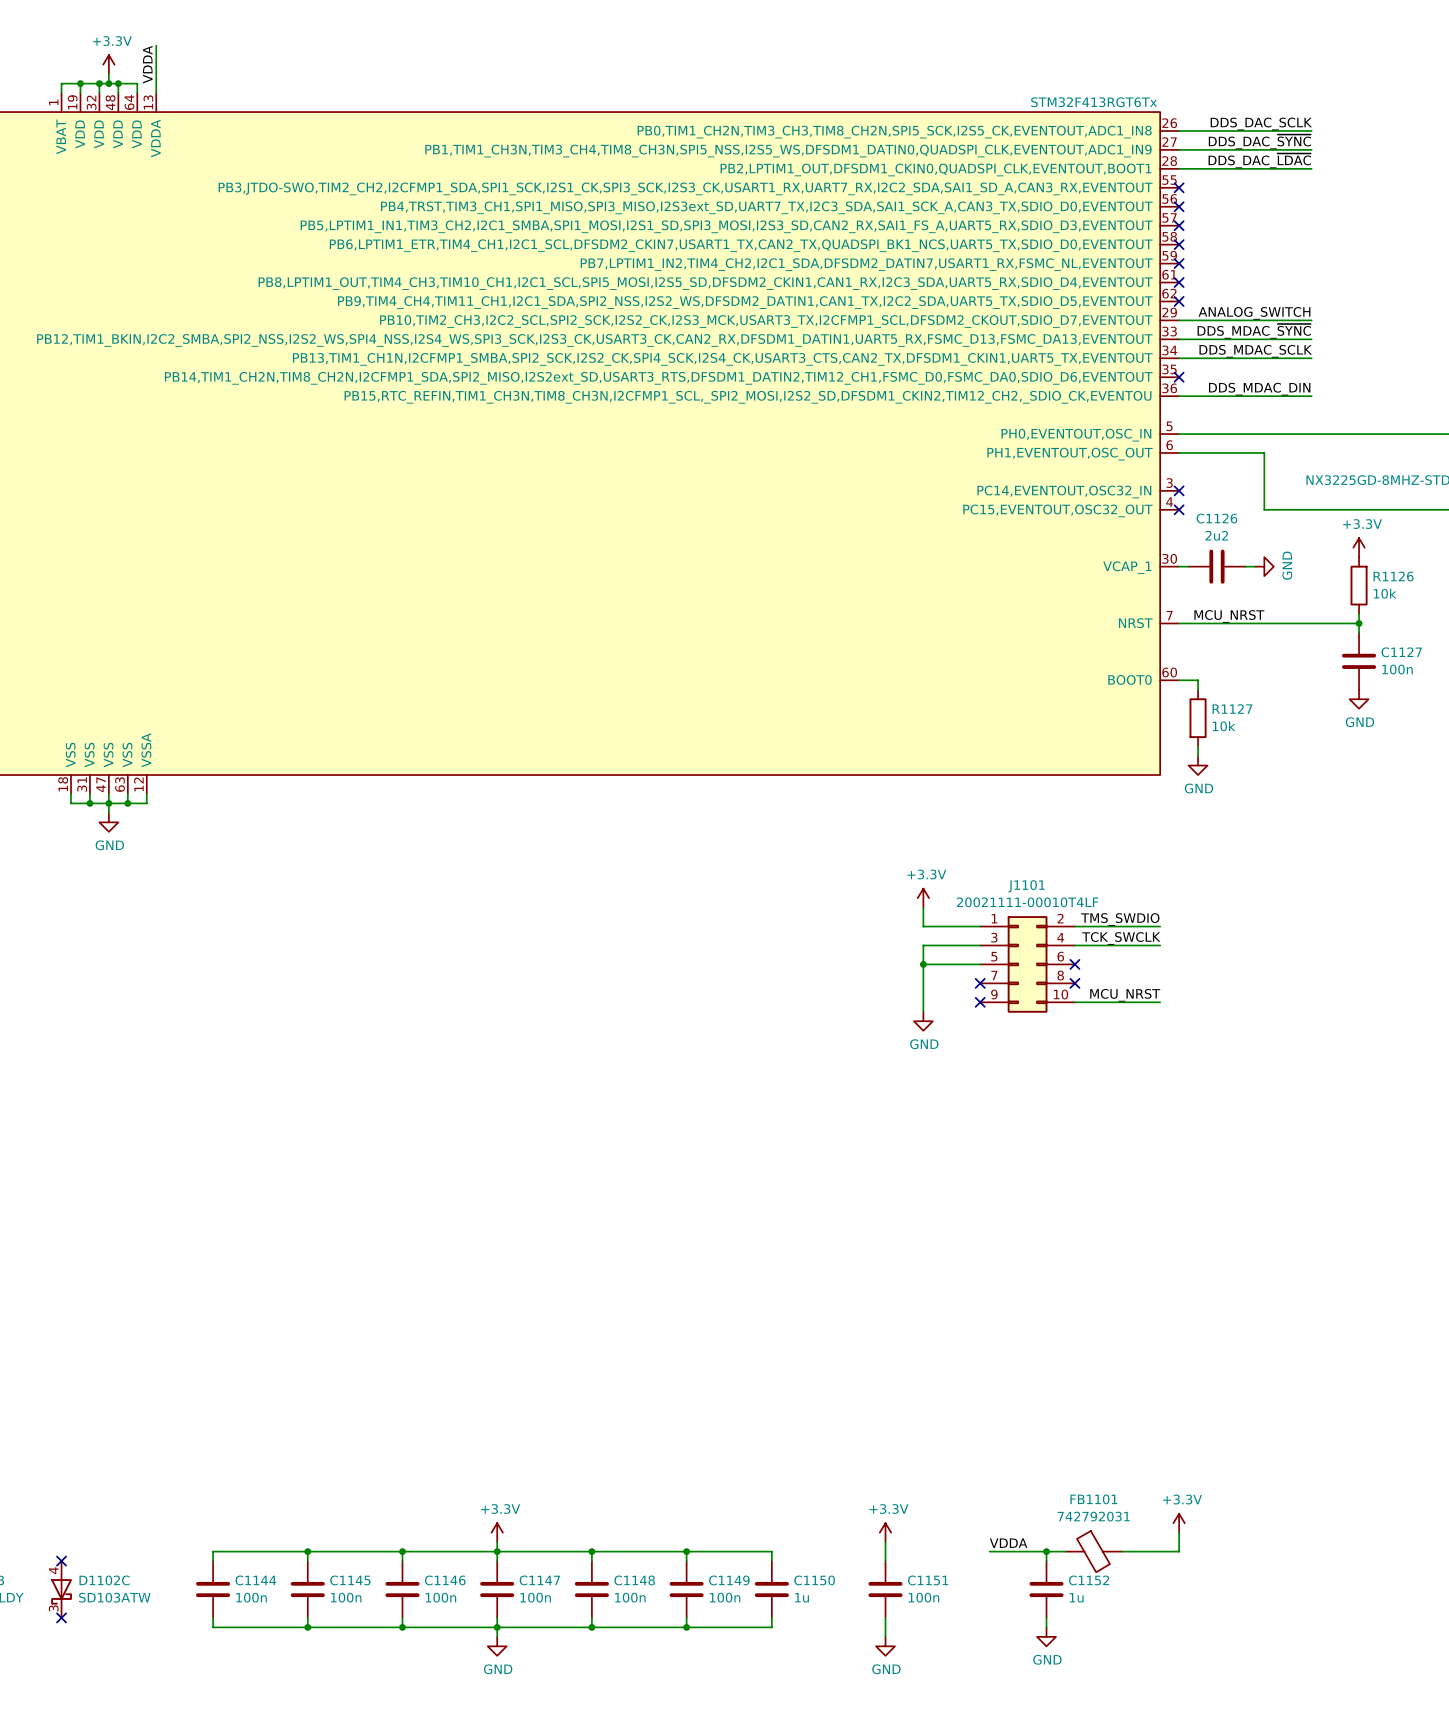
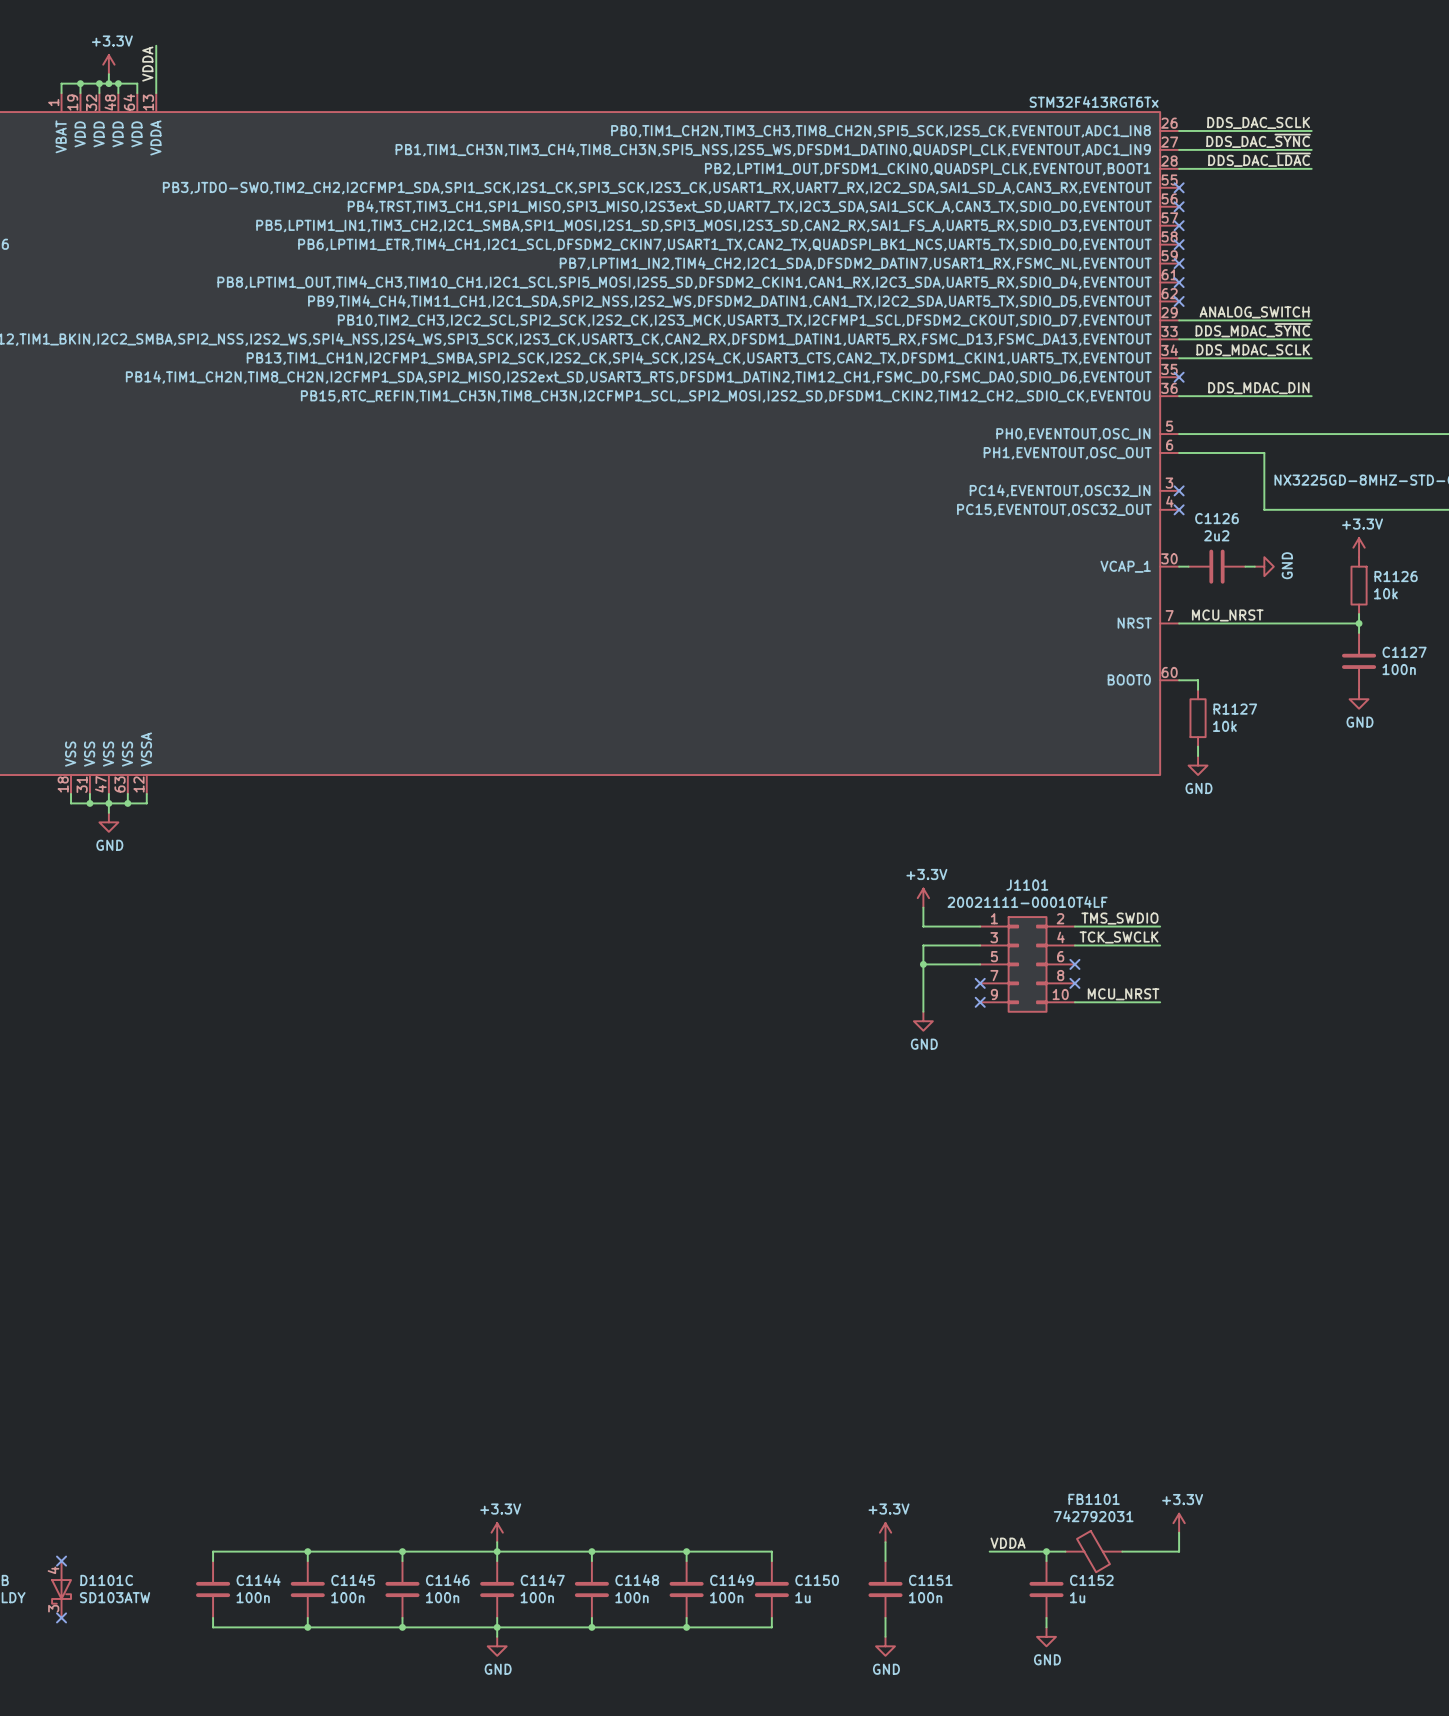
D1102C name: D1102C (104, 1580) -> D1101C (106, 1580)

